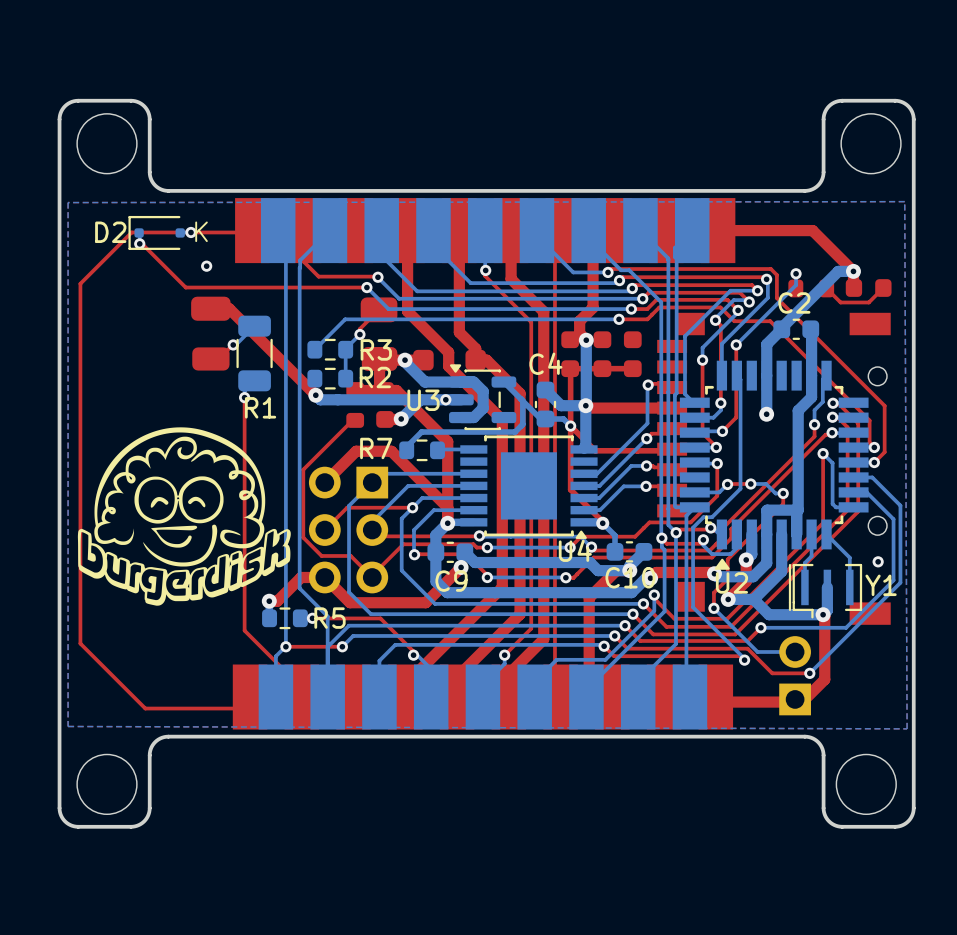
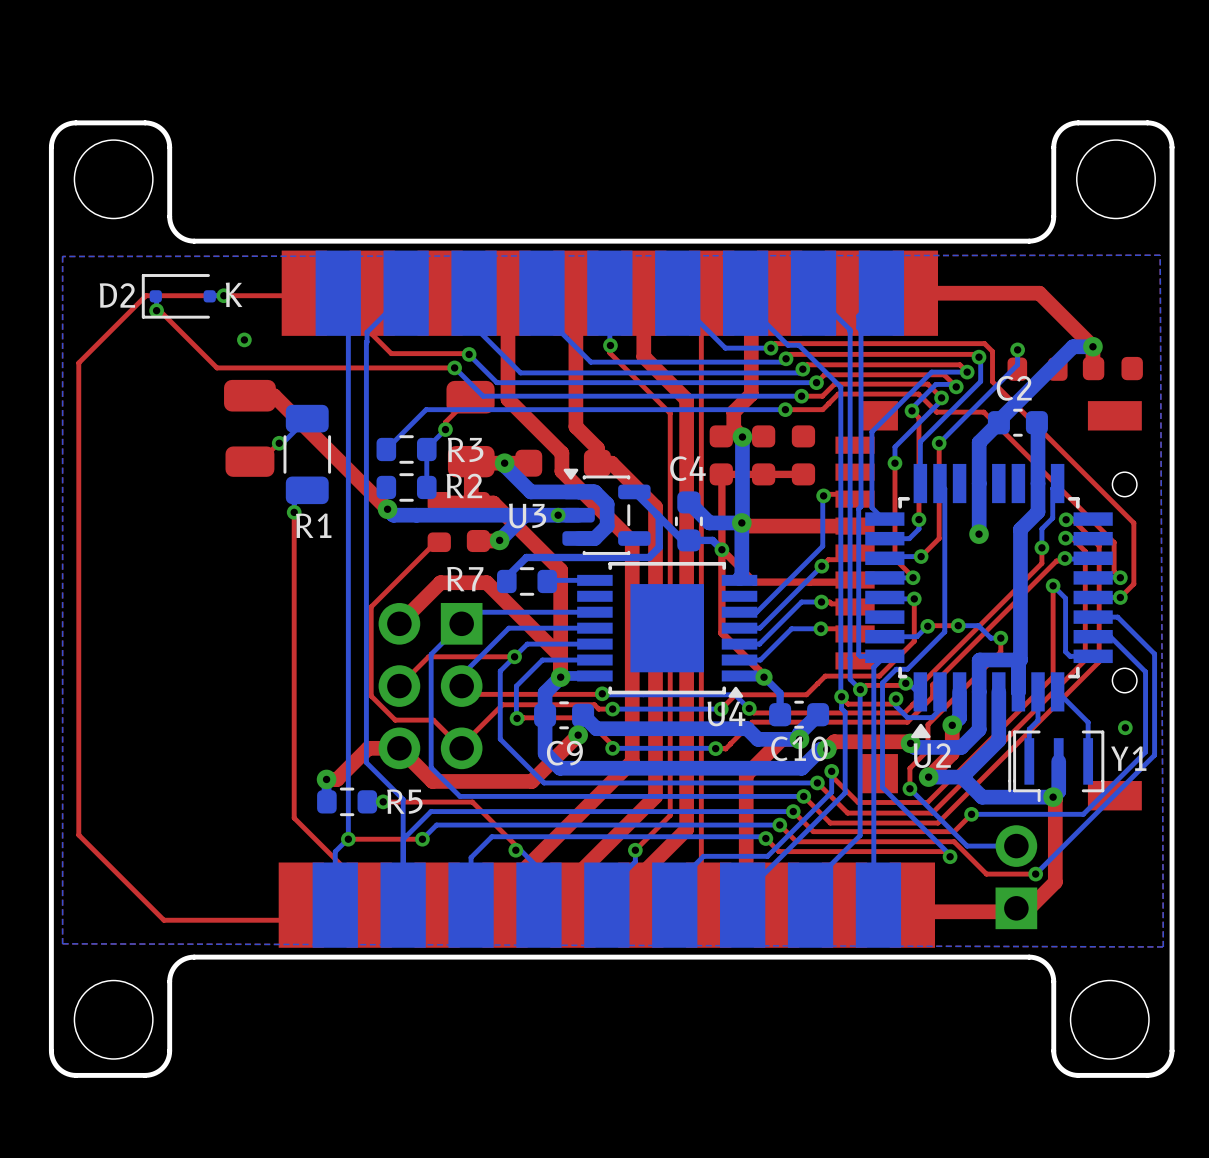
top track: (883, 288) (868, 302) (840, 302) (826, 288) -> none
drawing: [77, 427, 291, 606] -> none

